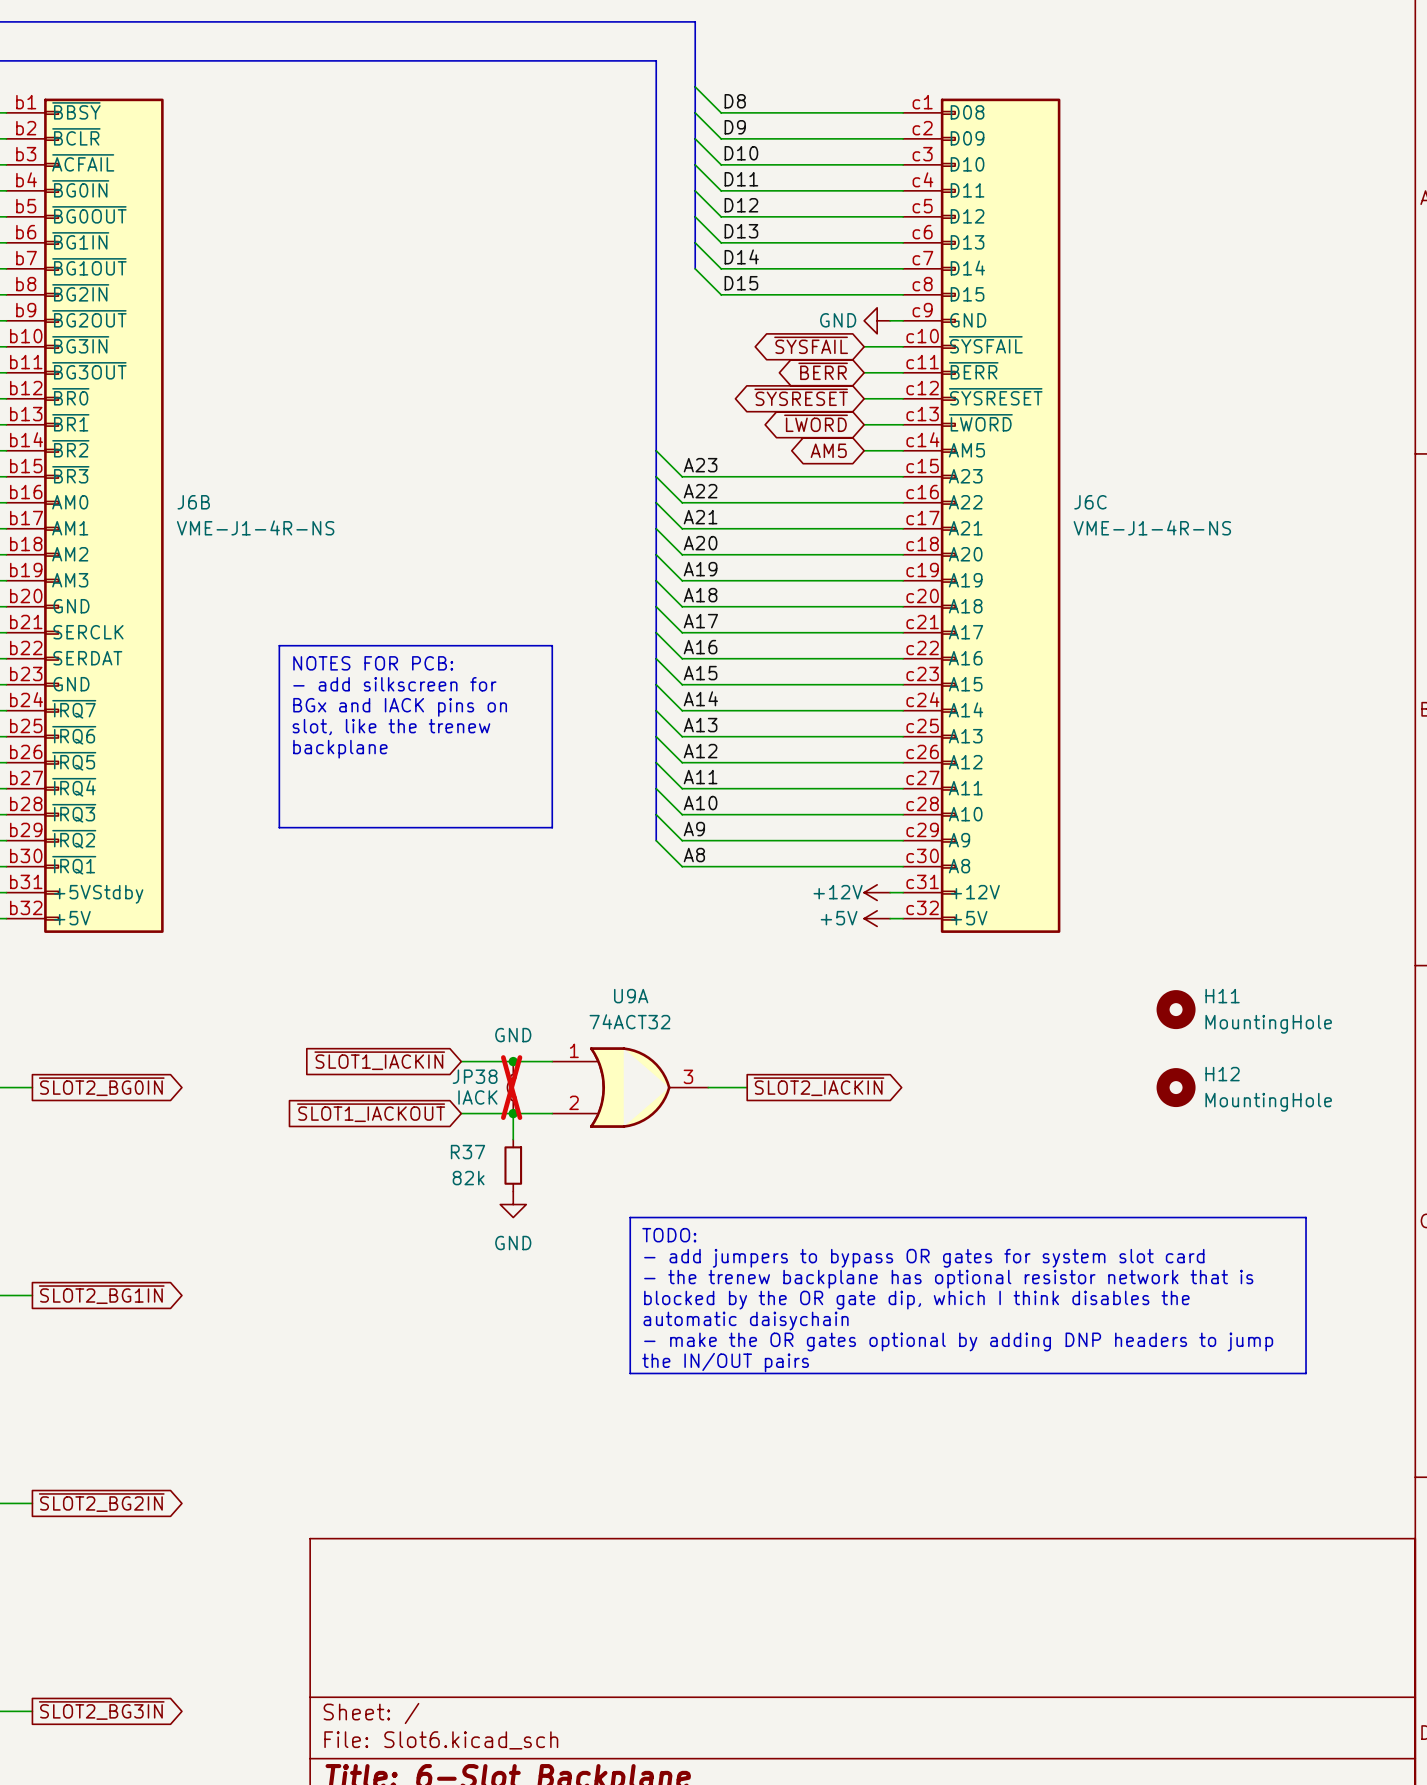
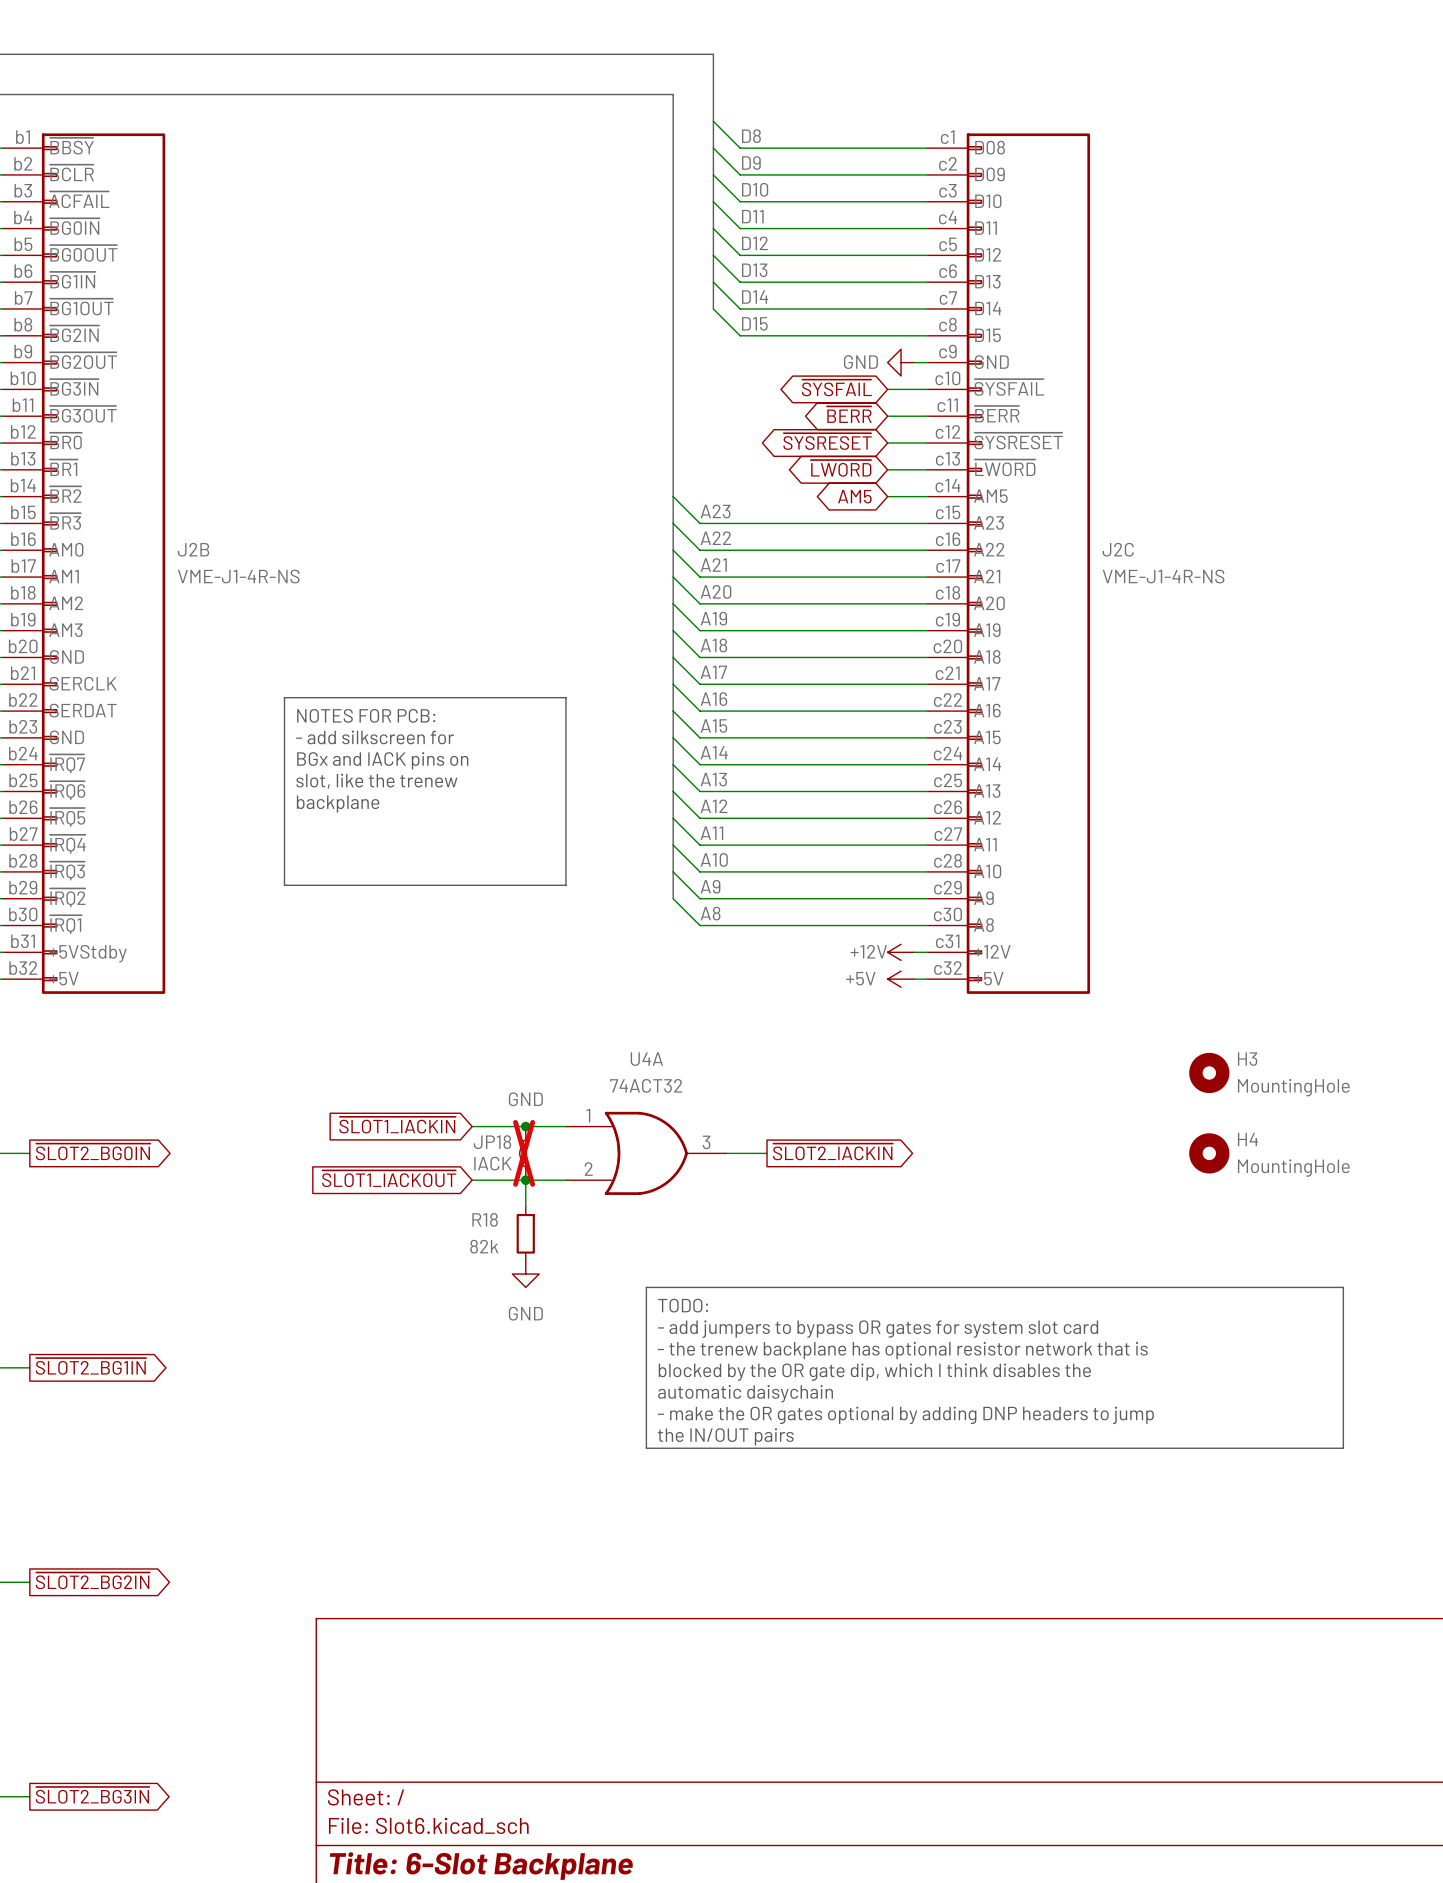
J6B name: J6B (193, 502) -> J2B (193, 549)
J6C name: J6C (1090, 502) -> J2C (1118, 549)
U9A name: U9A (631, 996) -> U4A (646, 1059)
H11 name: H11 (1222, 996) -> H3 (1247, 1059)
H12 name: H12 (1222, 1074) -> H4 (1247, 1139)
JP38 name: JP38 (475, 1076) -> JP18 (492, 1142)
R37 name: R37 (467, 1152) -> R18 (485, 1219)

